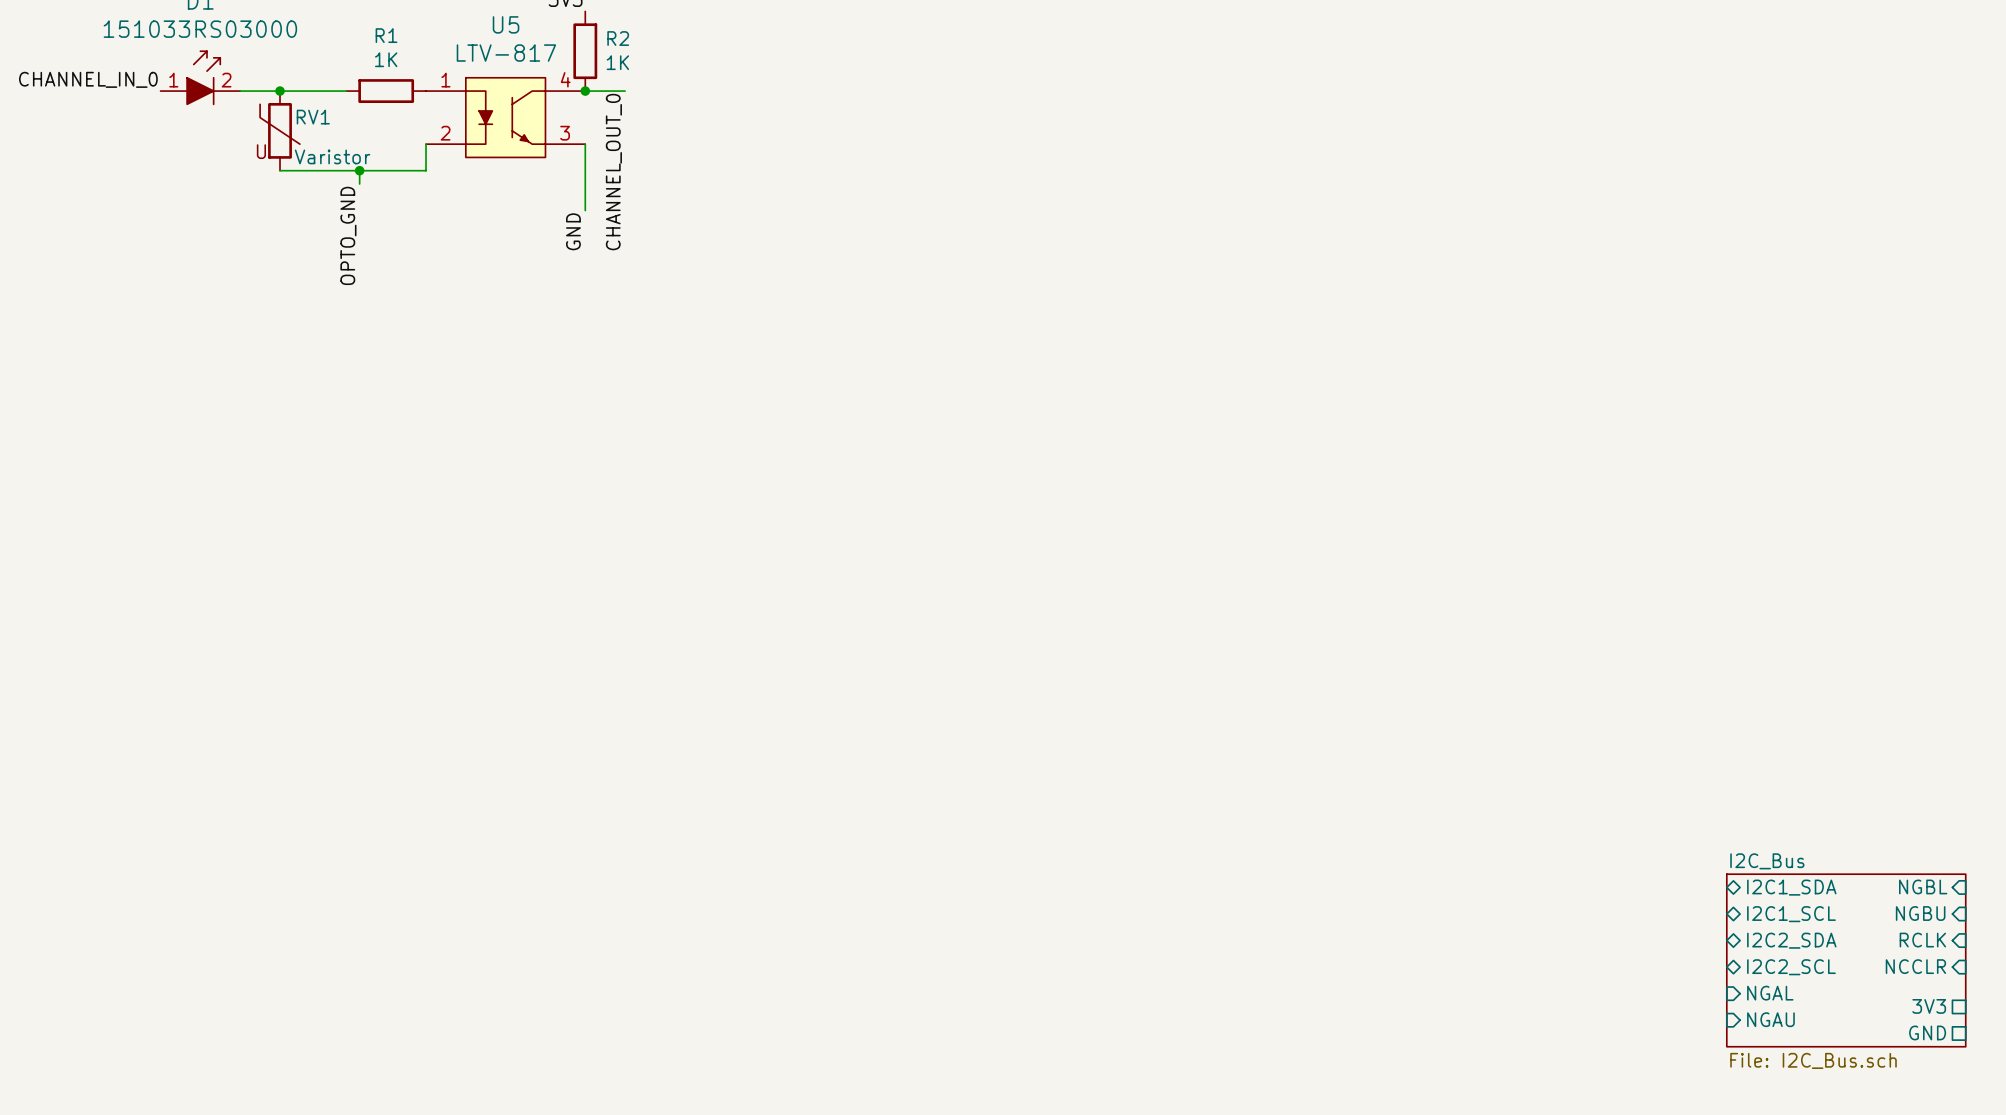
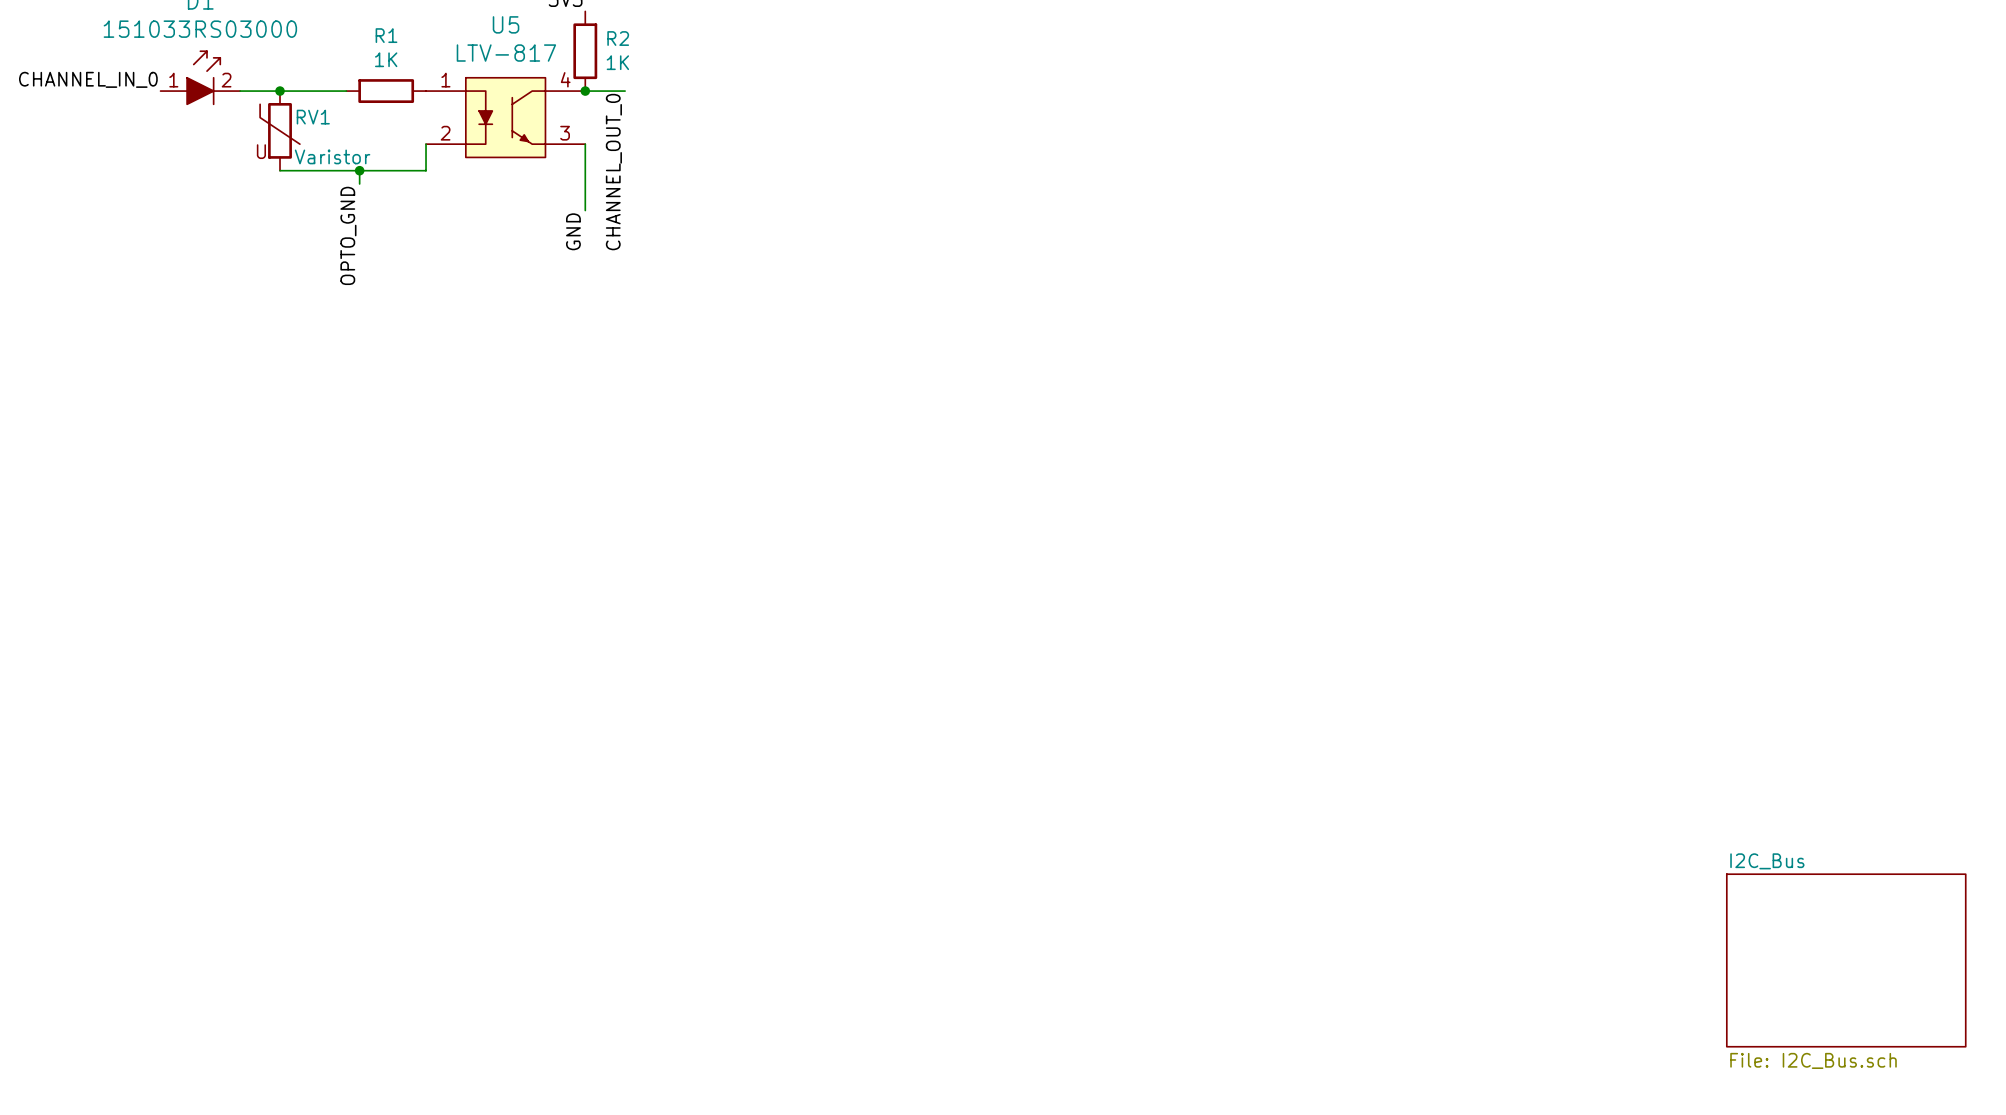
sheet pin: NGBL (1923, 886) -> none
sheet pin: I2C1_SDA (1791, 887) -> none
sheet pin: NGBU (1920, 913) -> none
sheet pin: I2C1_SCL (1791, 914) -> none
sheet pin: I2C2_SDA (1791, 940) -> none
sheet pin: RCLK (1922, 940) -> none
sheet pin: NCCLR (1915, 966) -> none
sheet pin: I2C2_SCL (1791, 967) -> none
sheet pin: NGAL (1770, 993) -> none
sheet pin: 3V3 (1929, 1006) -> none
sheet pin: NGAU (1770, 1019) -> none
sheet pin: GND (1927, 1032) -> none

